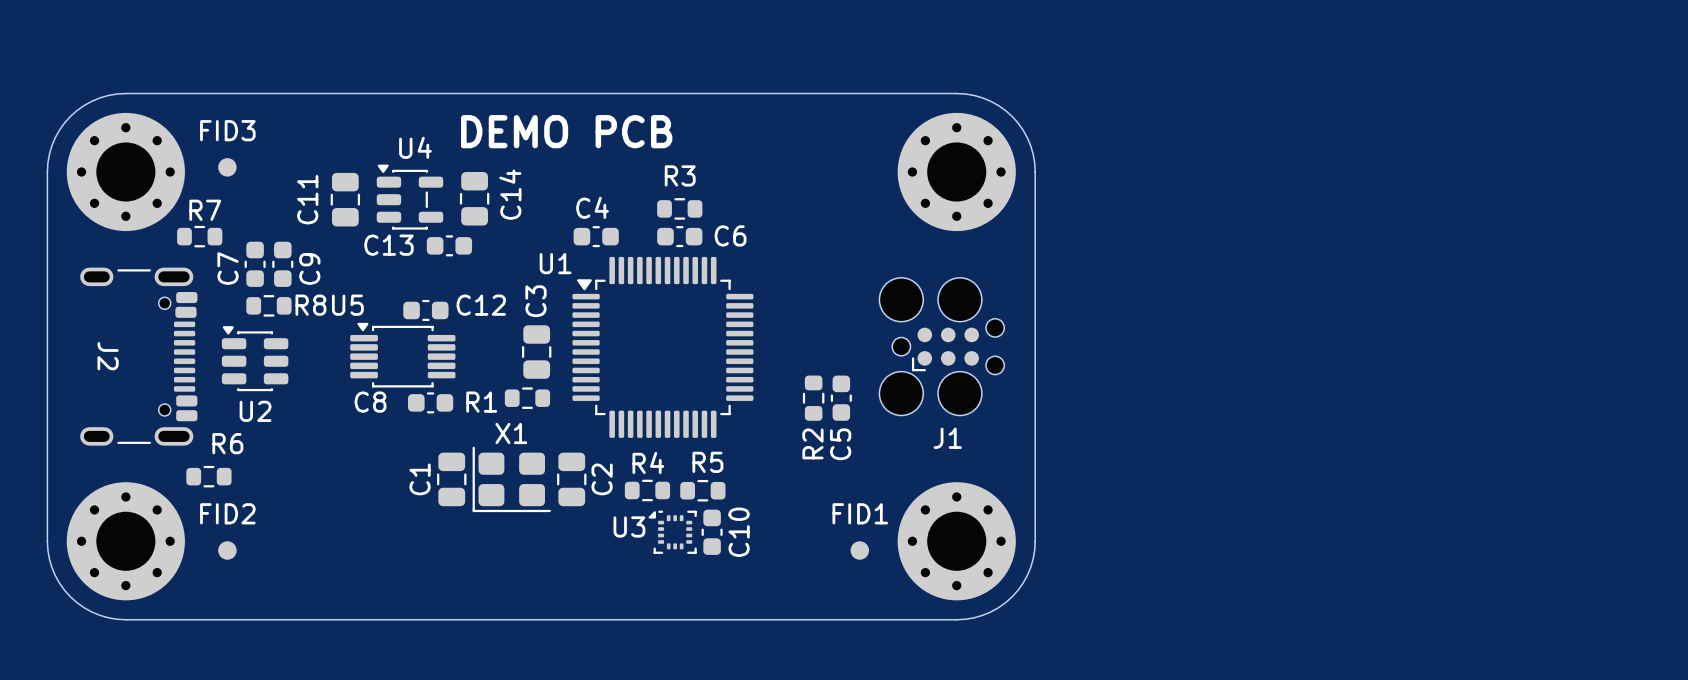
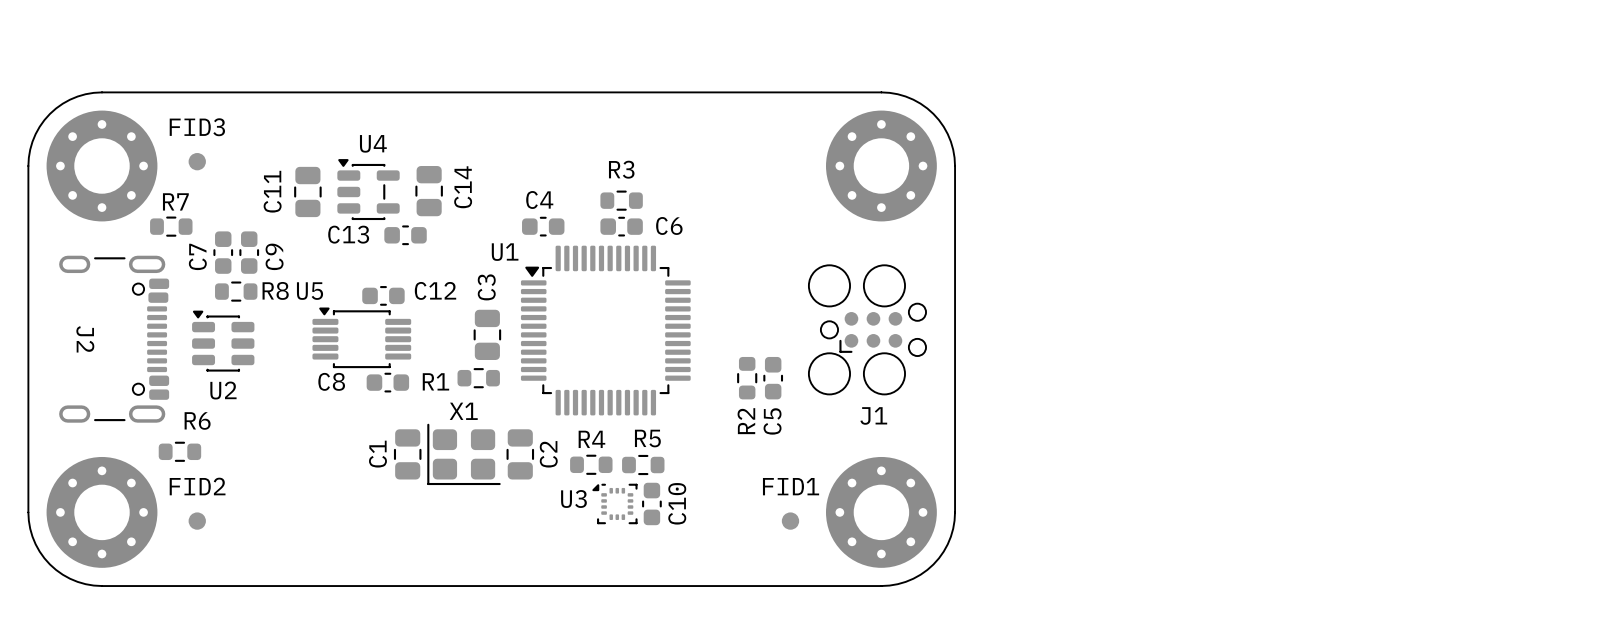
text: DEMO PCB (566, 131) -> none

